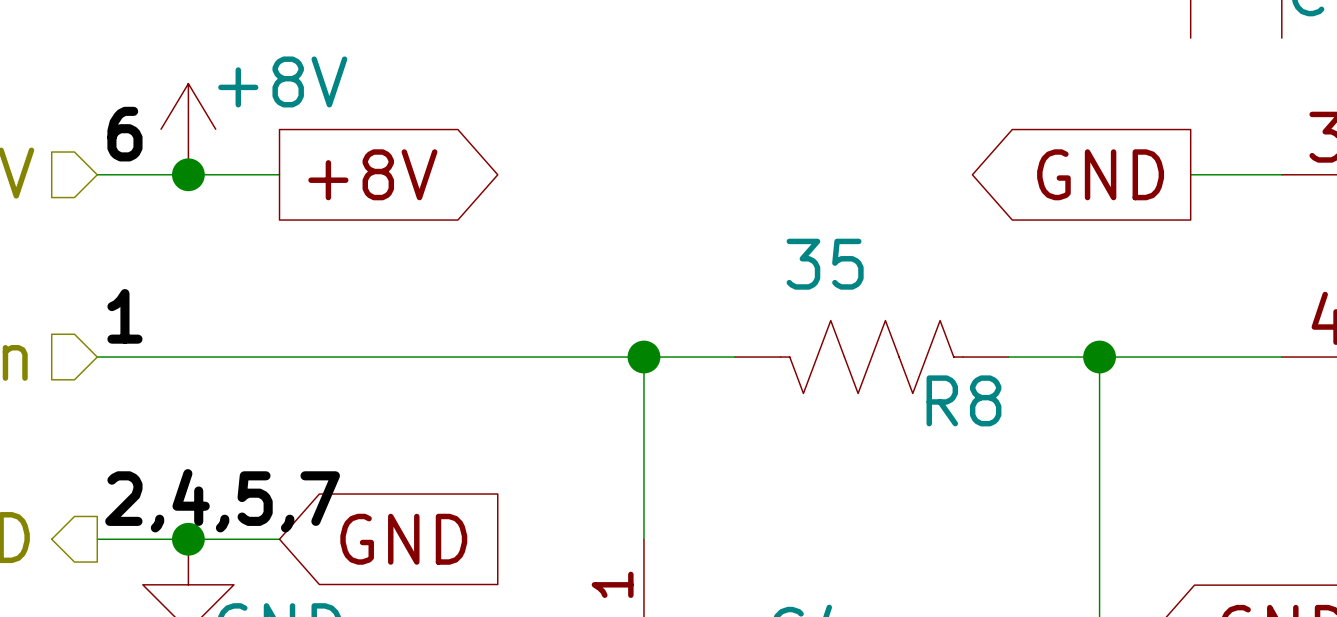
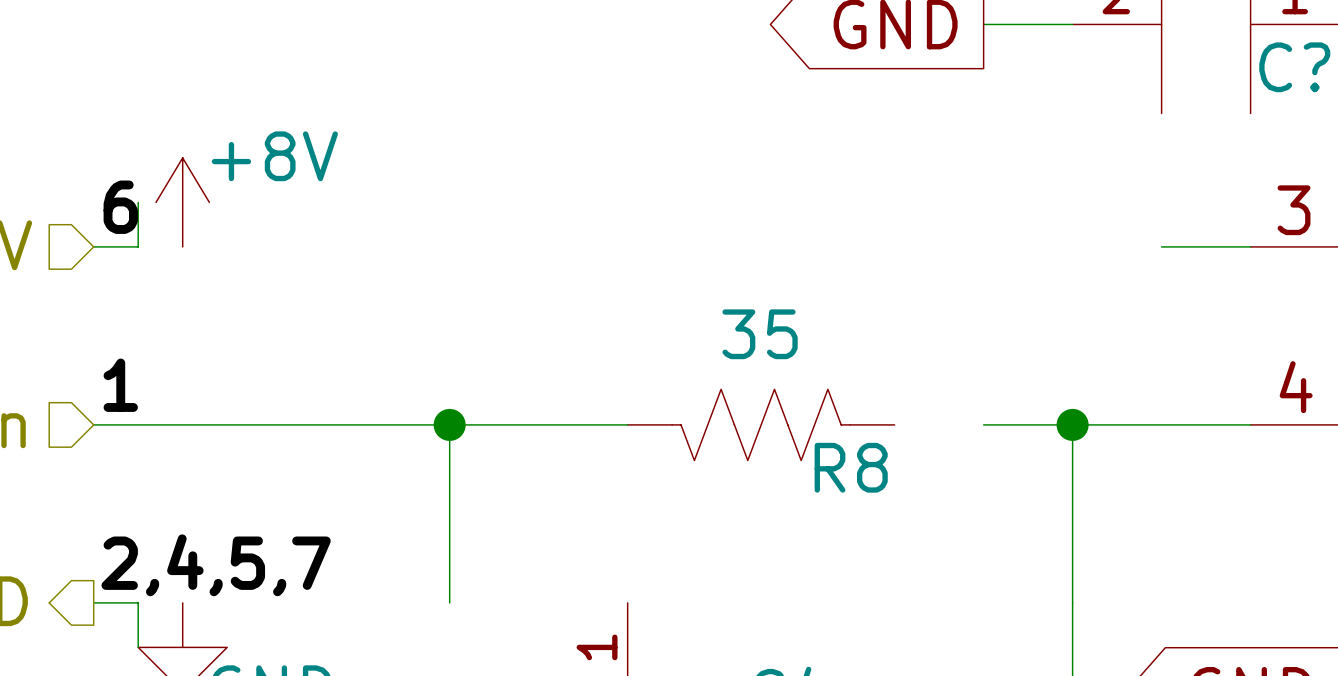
wire: (142, 174) (279, 174) -> (138, 246) (138, 202)
junction: (188, 174) -> none
global label: +8V (372, 174) -> none
global label: GND (1100, 174) -> none
R8 value position: 35 (825, 264) -> 35 (760, 334)
wire: none -> (449, 424) (449, 602)
junction: none -> (449, 424)
junction: (643, 357) -> none
wire: (735, 357) (643, 357) (643, 539) -> none
R8 position: (871, 357) -> (761, 424)
wire: (142, 539) (279, 539) -> (138, 602) (138, 647)
junction: (188, 539) -> none
global label: GND (403, 539) -> none

